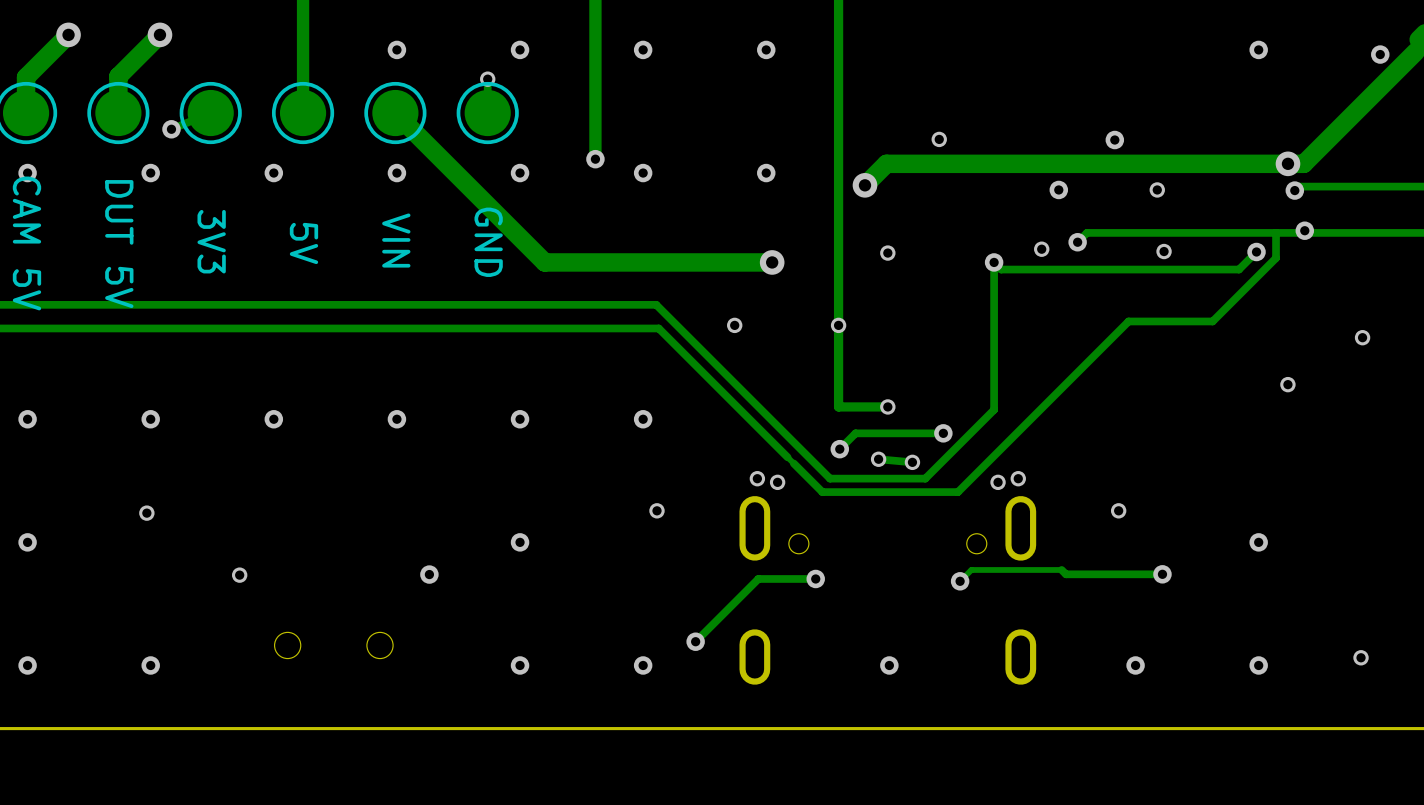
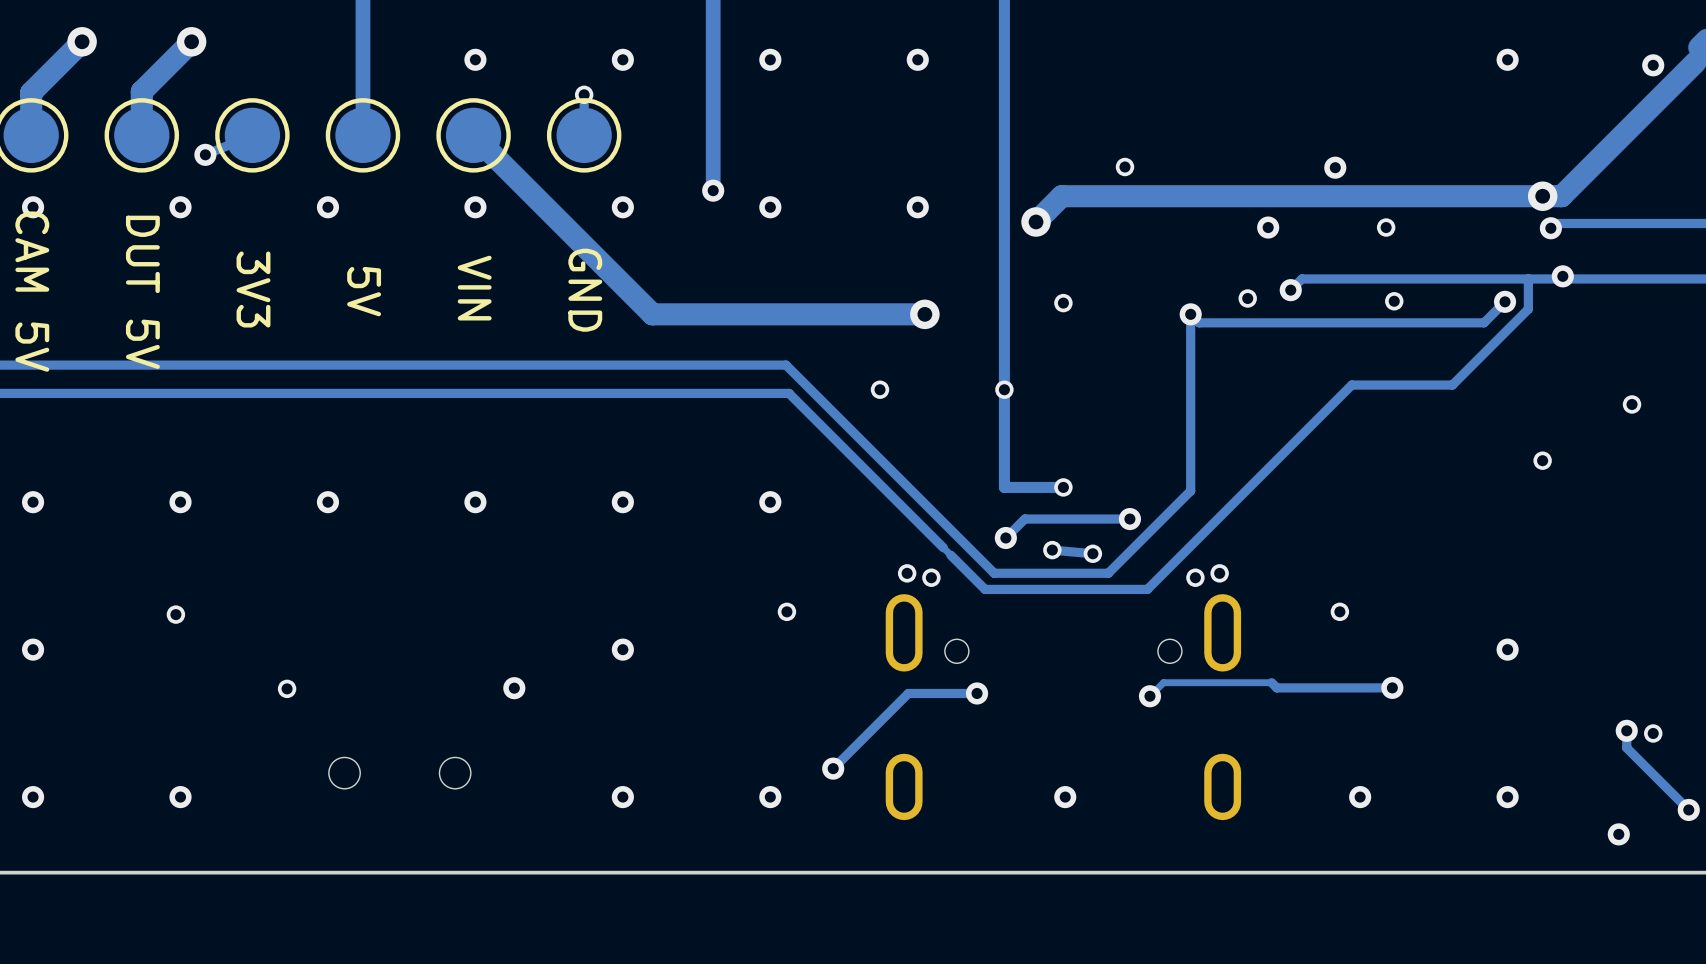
track: none -> (1626, 730) (1626, 747) (1688, 809)
via: none -> (1626, 730)
via position: (1361, 657) -> (1653, 733)
via: none -> (1688, 809)
via: none -> (1618, 834)

